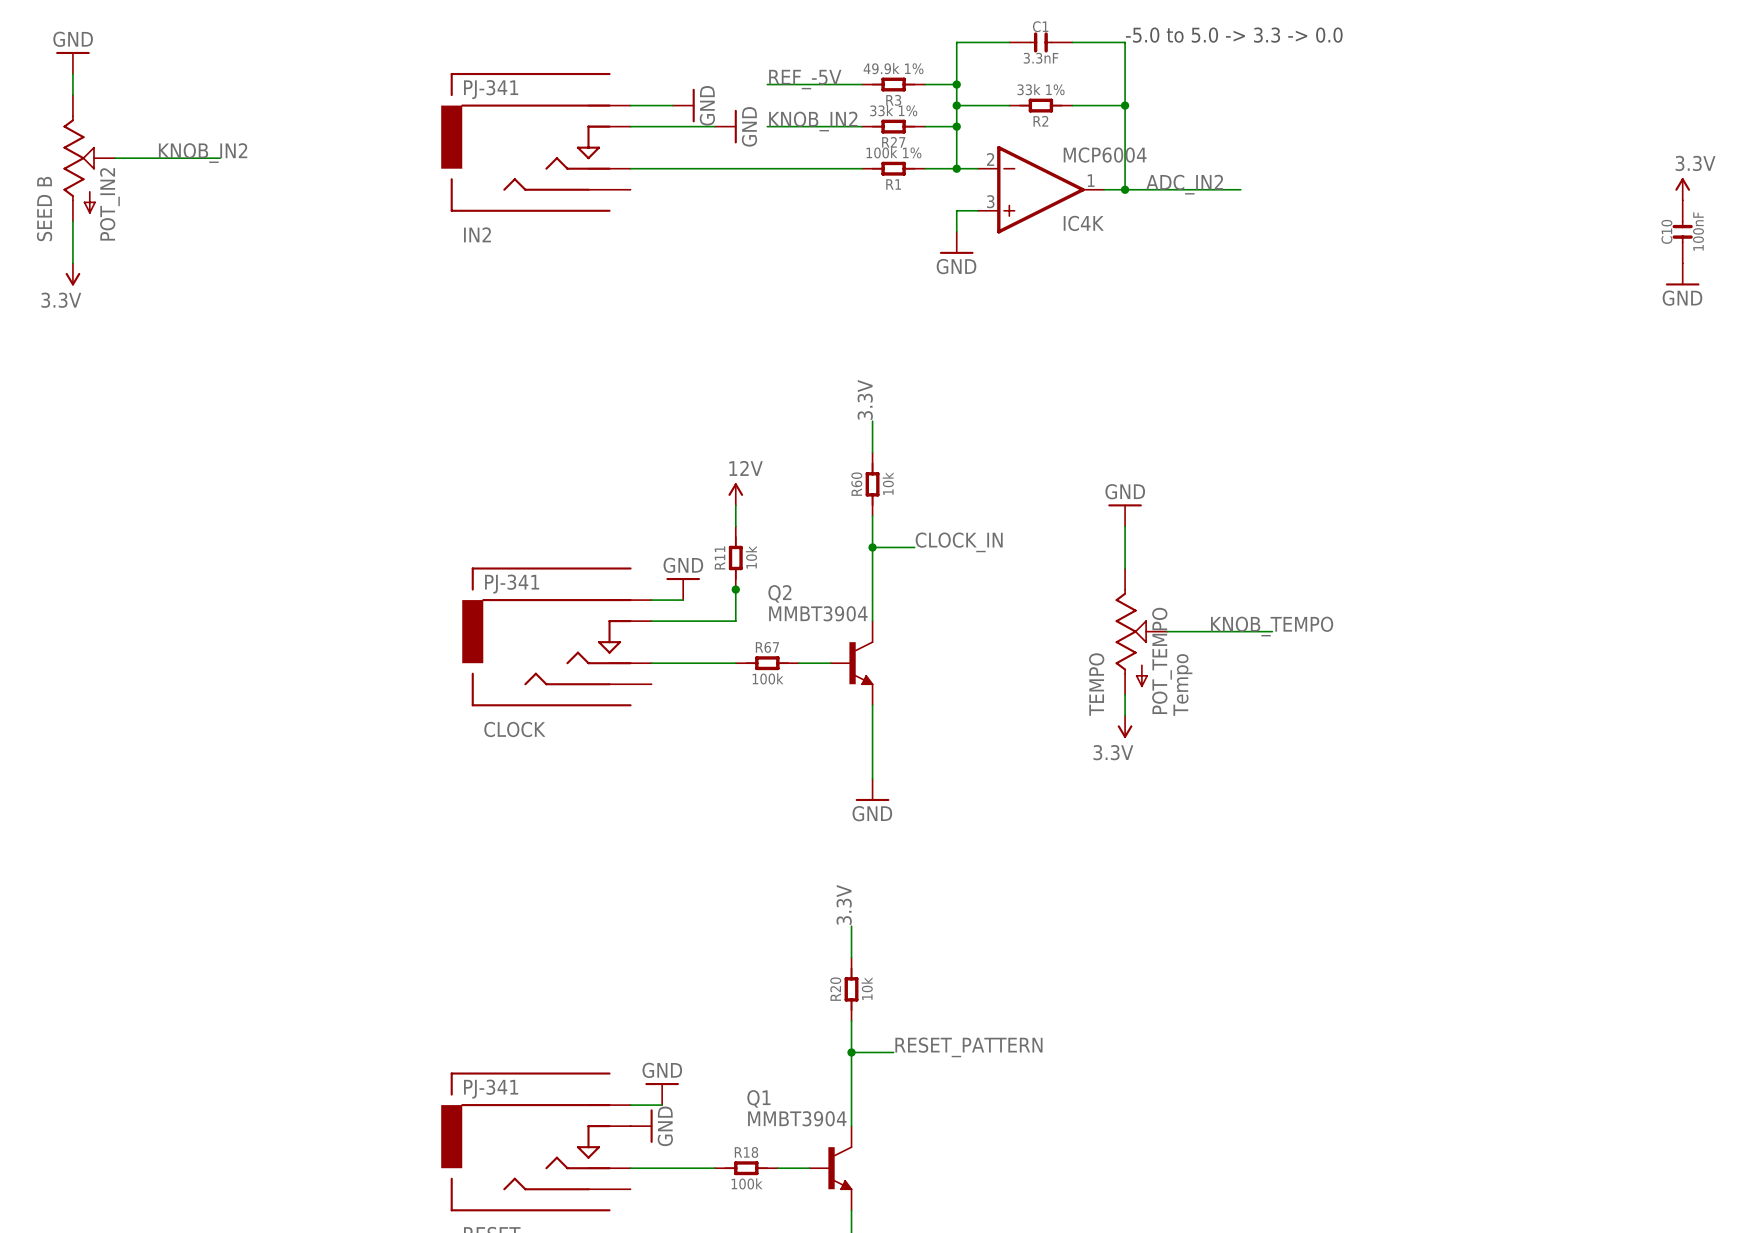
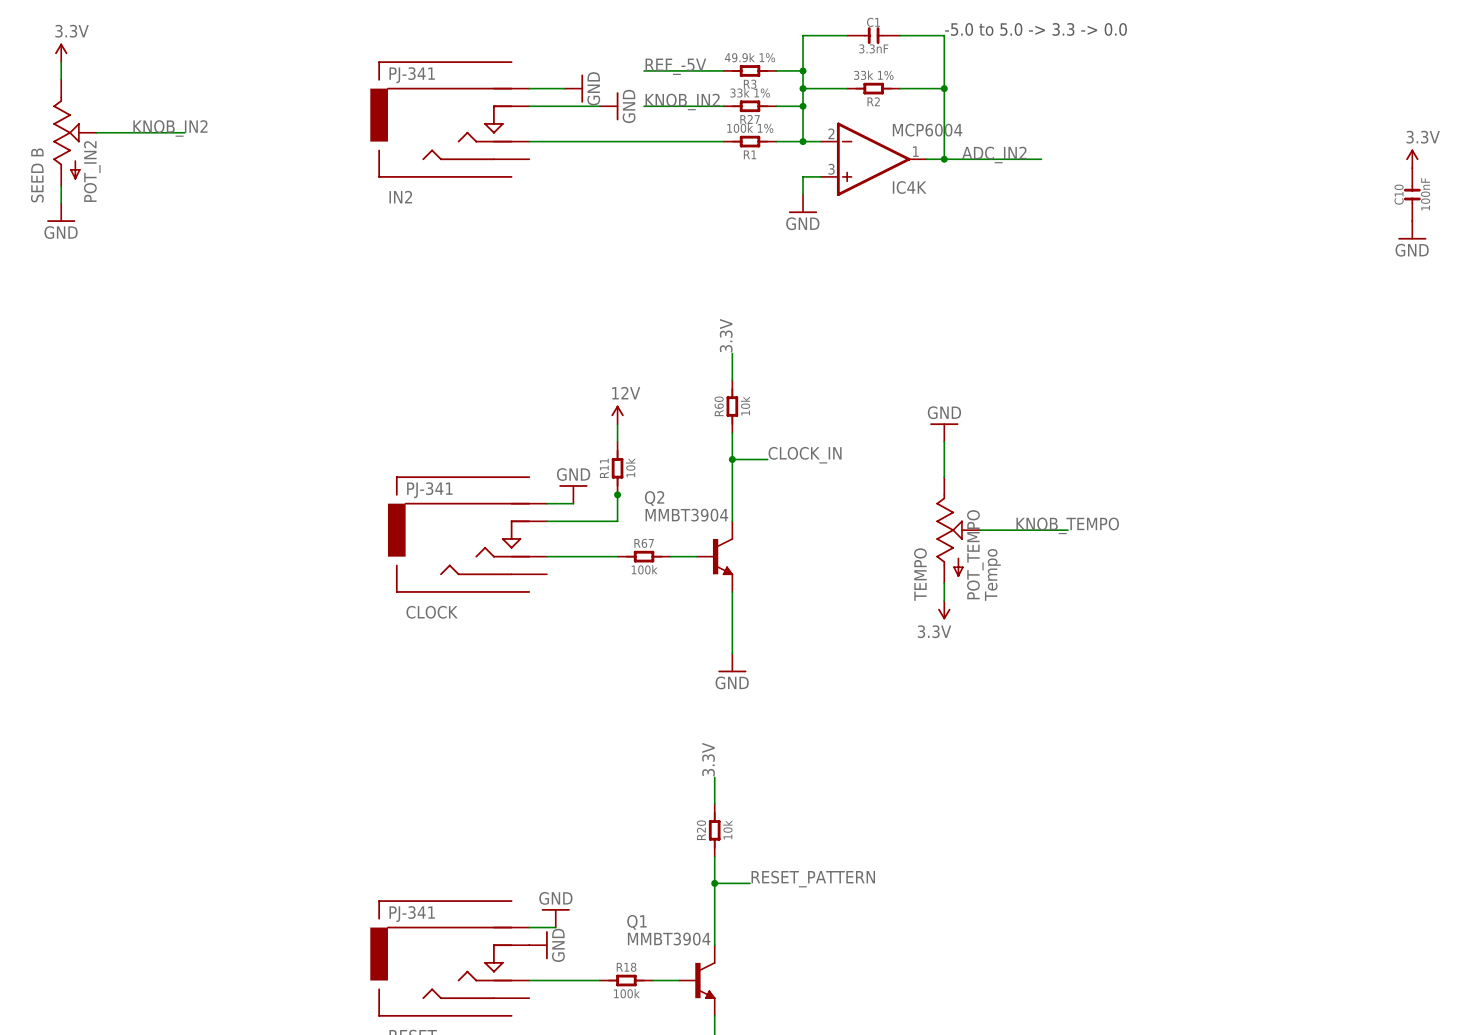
power symbol: GND (72, 62) -> 3.3V (61, 52)
power symbol: none -> GND (61, 212)
power symbol: 3.3V (72, 274) -> none

